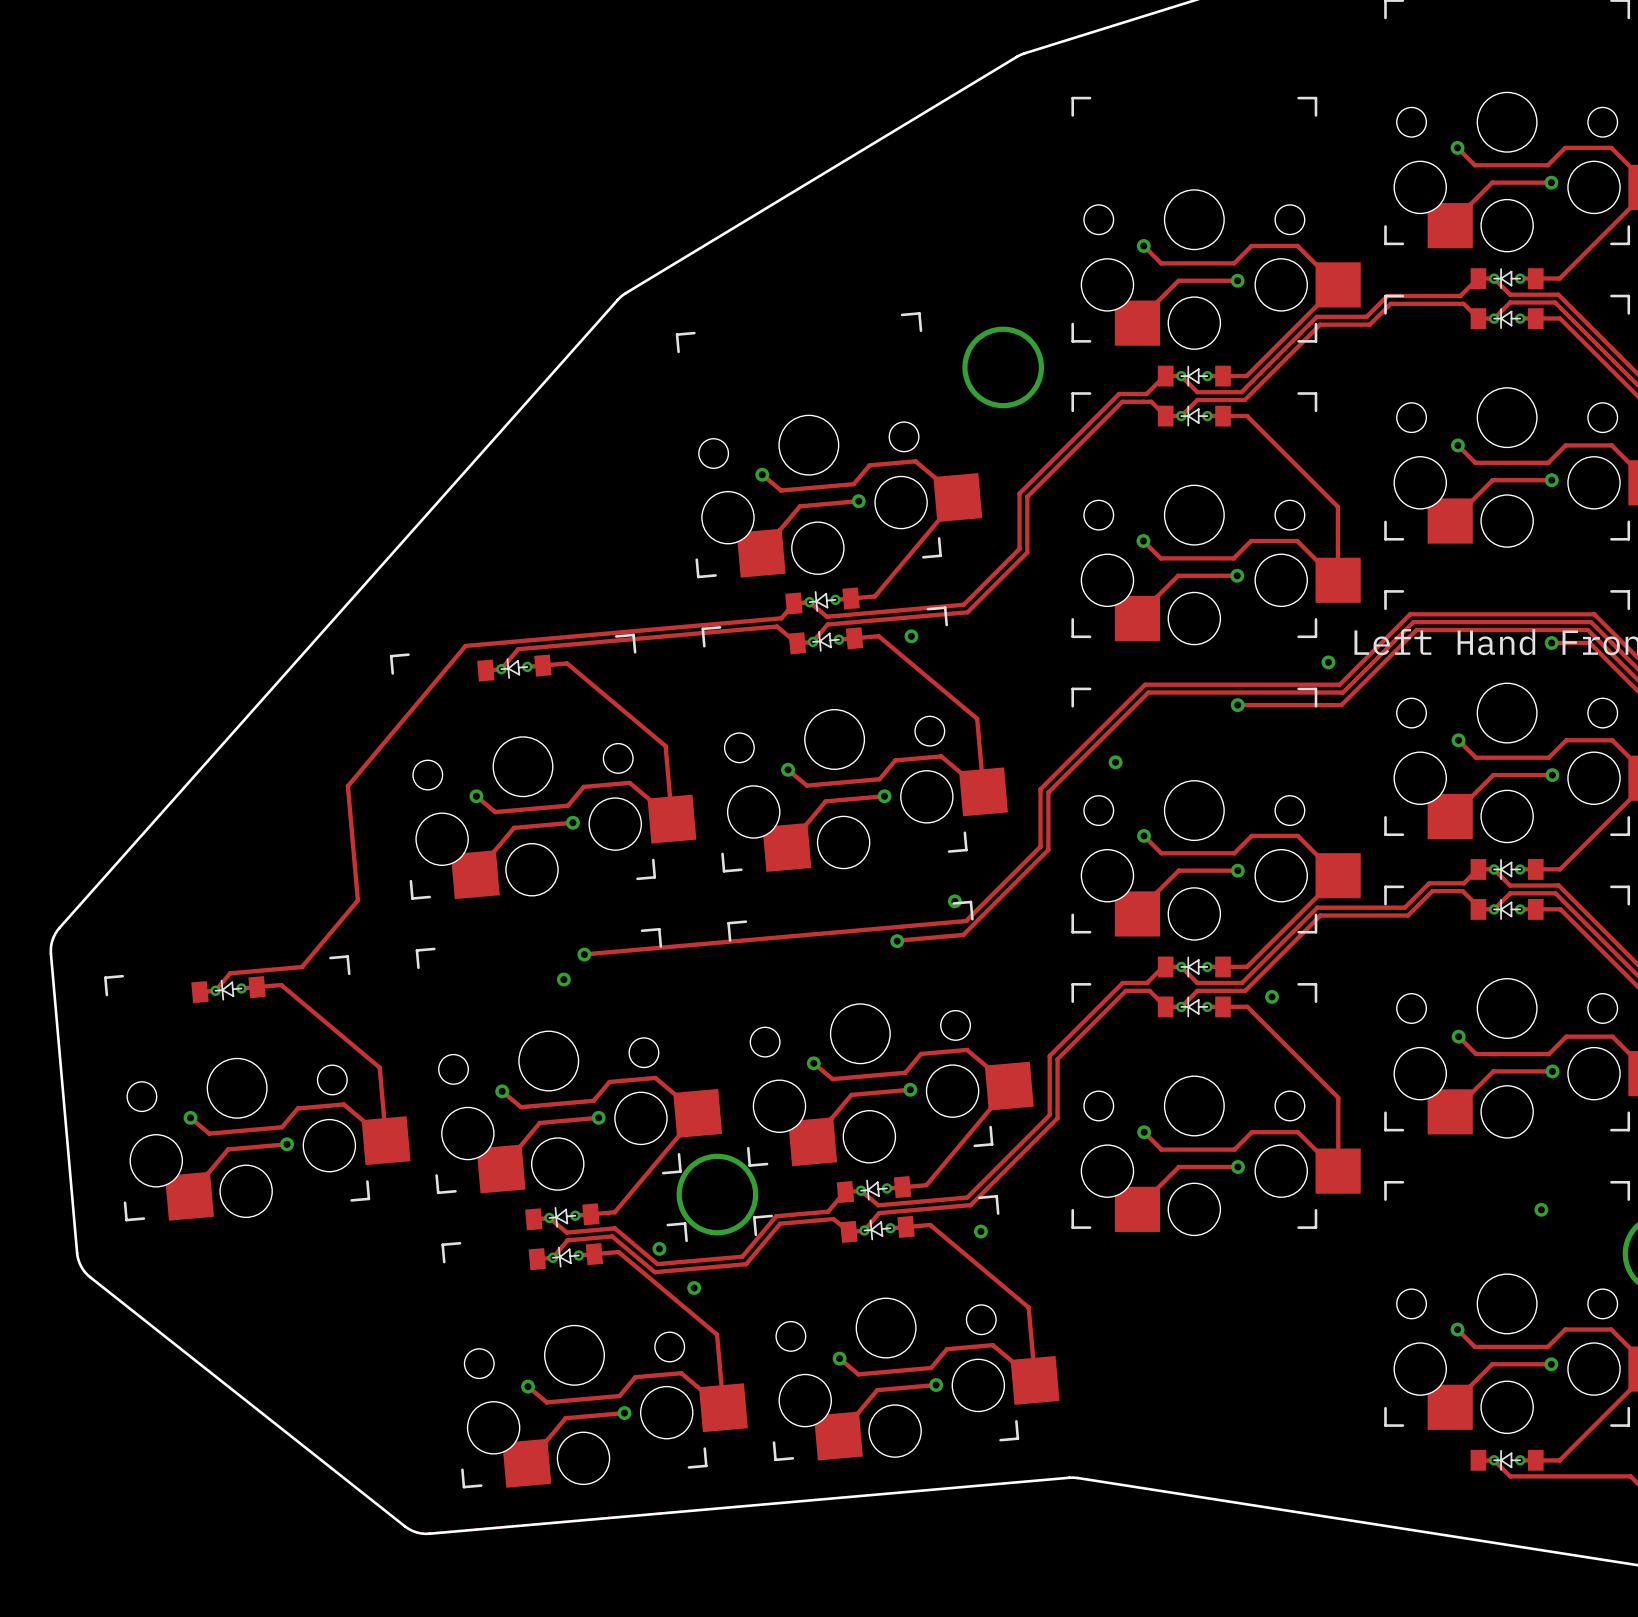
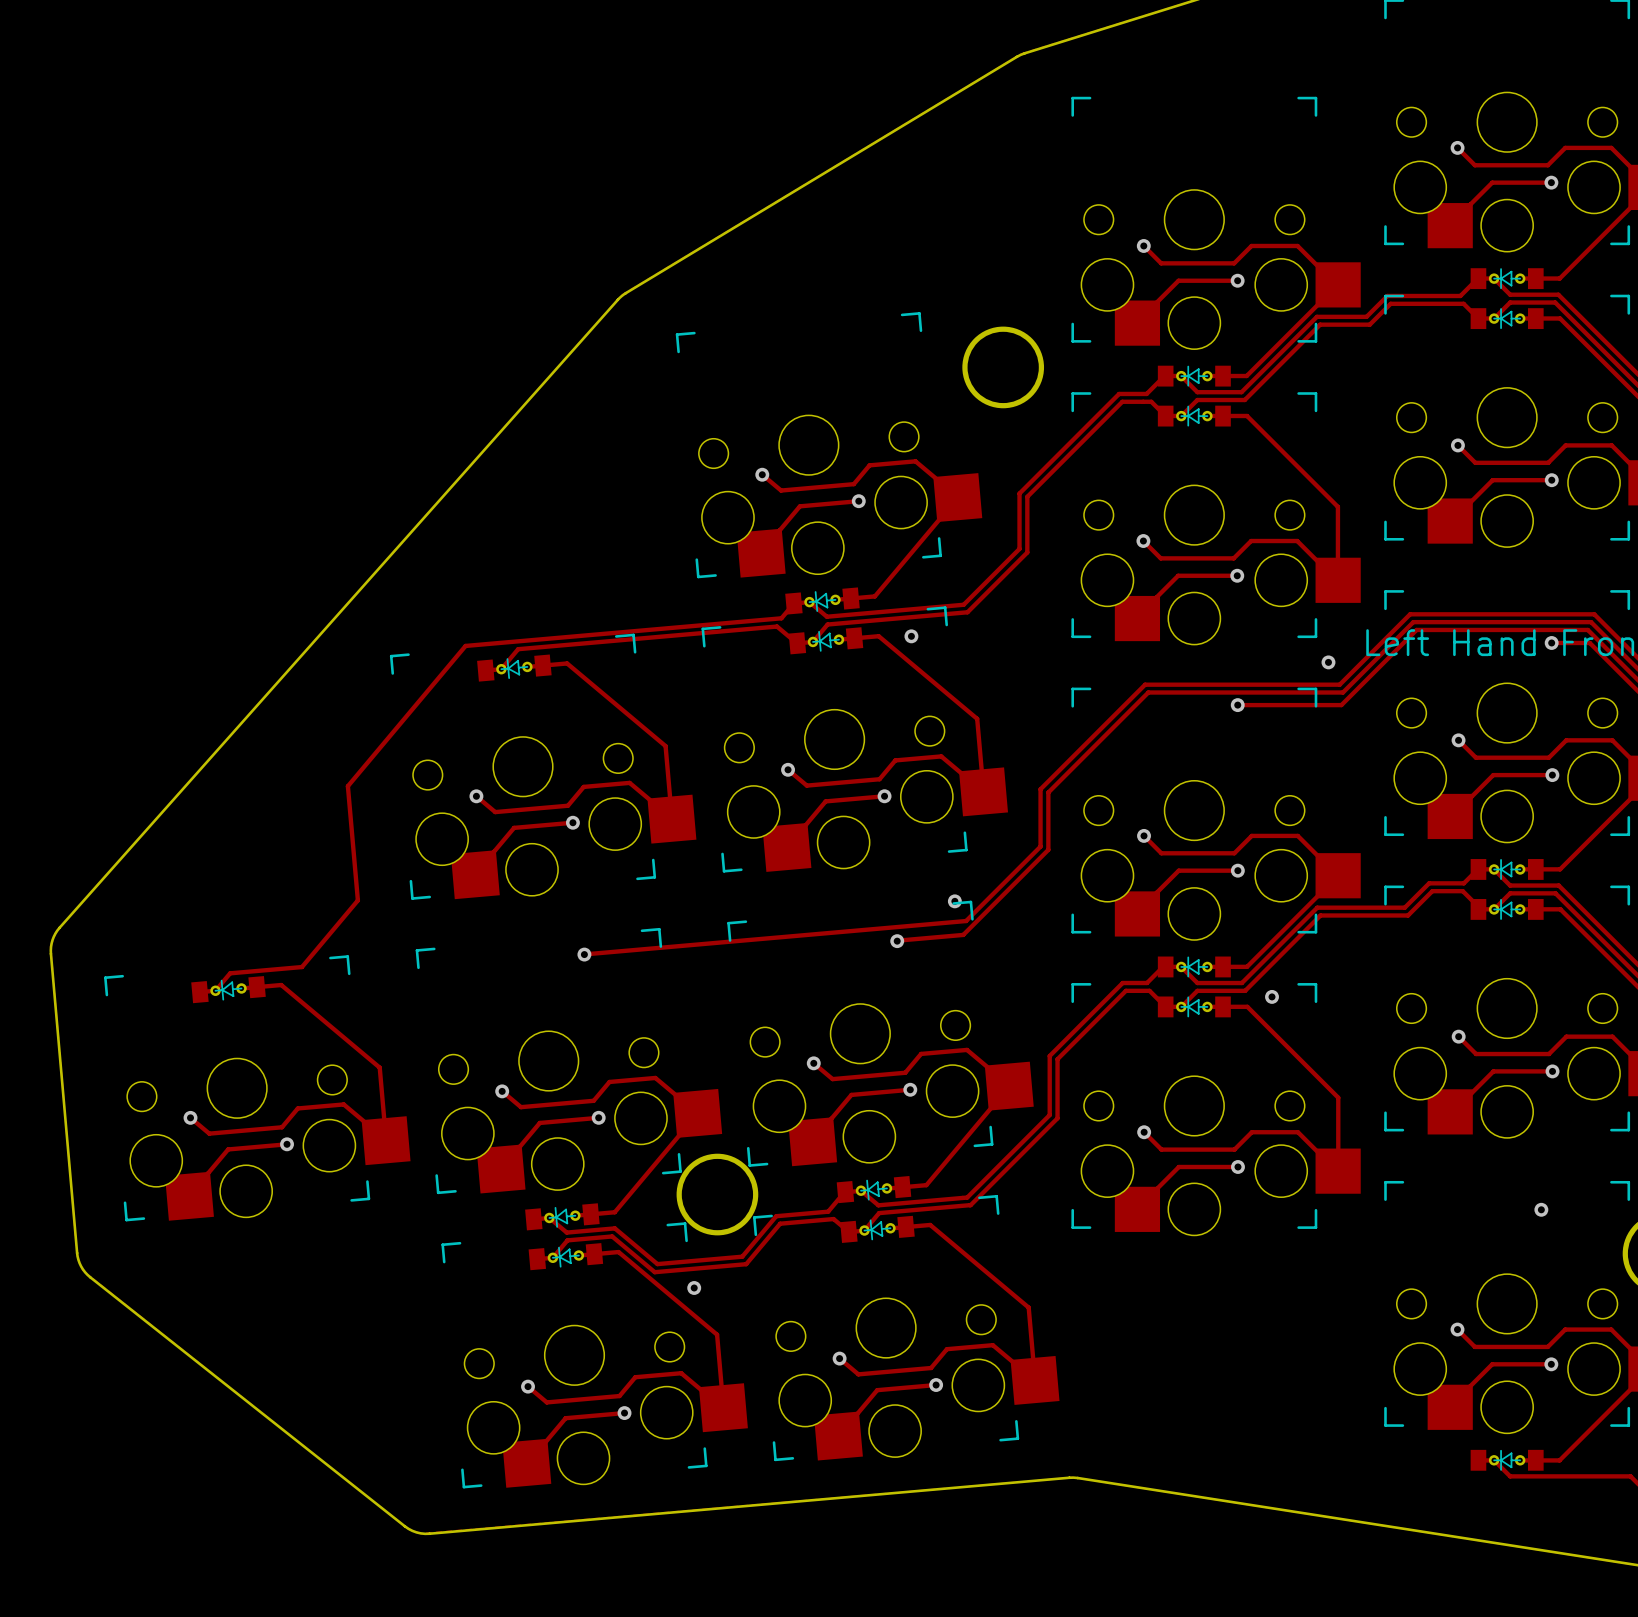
via: (1115, 762) -> none
via: (563, 979) -> none
via: (980, 1231) -> none
via: (659, 1248) -> none

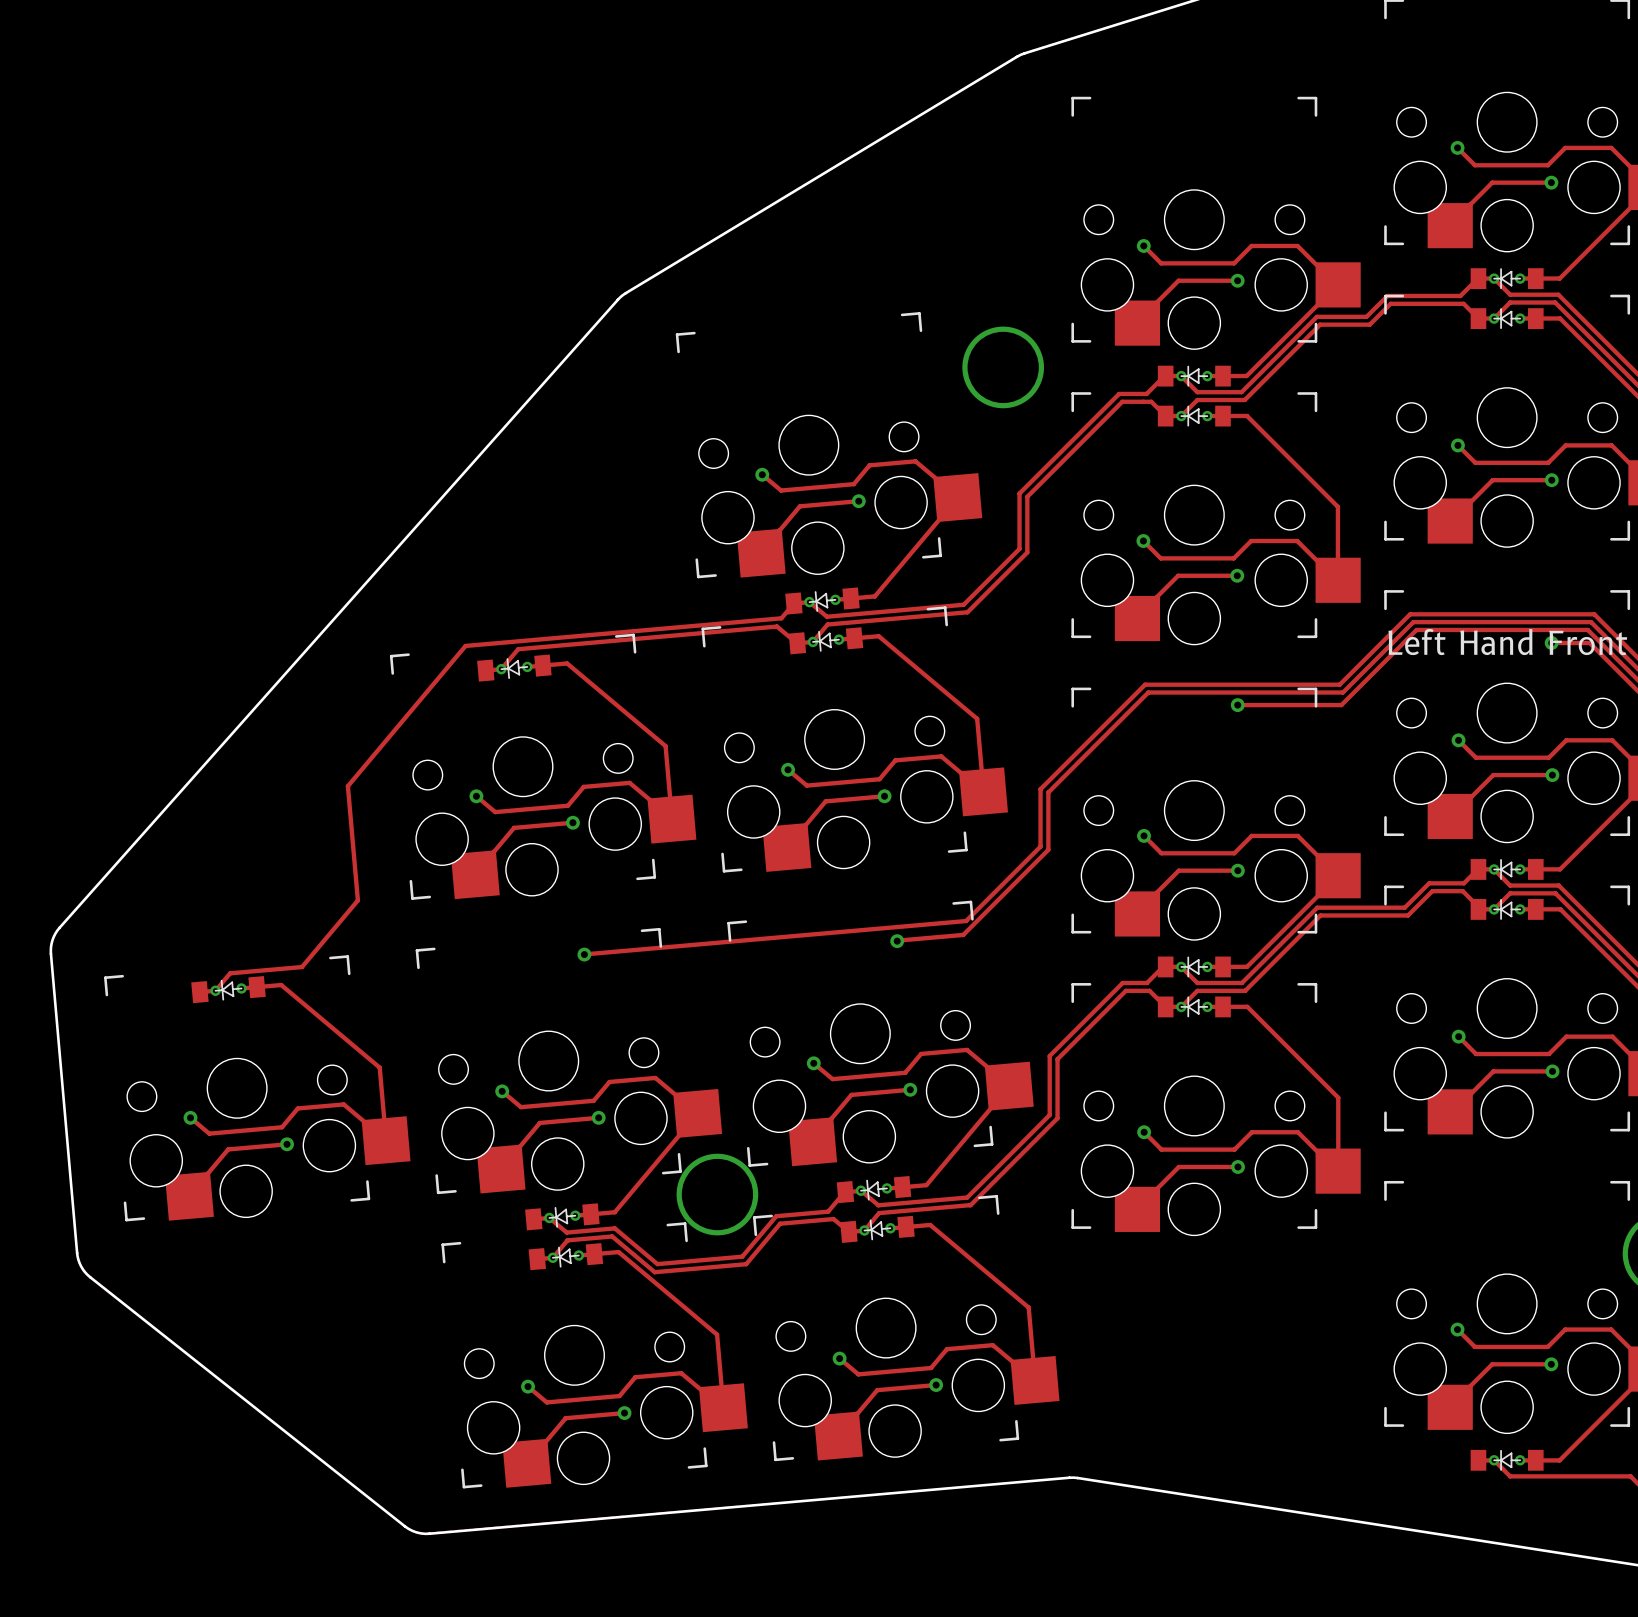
via: (911, 636) -> none
via: (1328, 662) -> none
via: (954, 901) -> none
via: (1272, 996) -> none
via: (1541, 1209) -> none
via: (694, 1287) -> none

